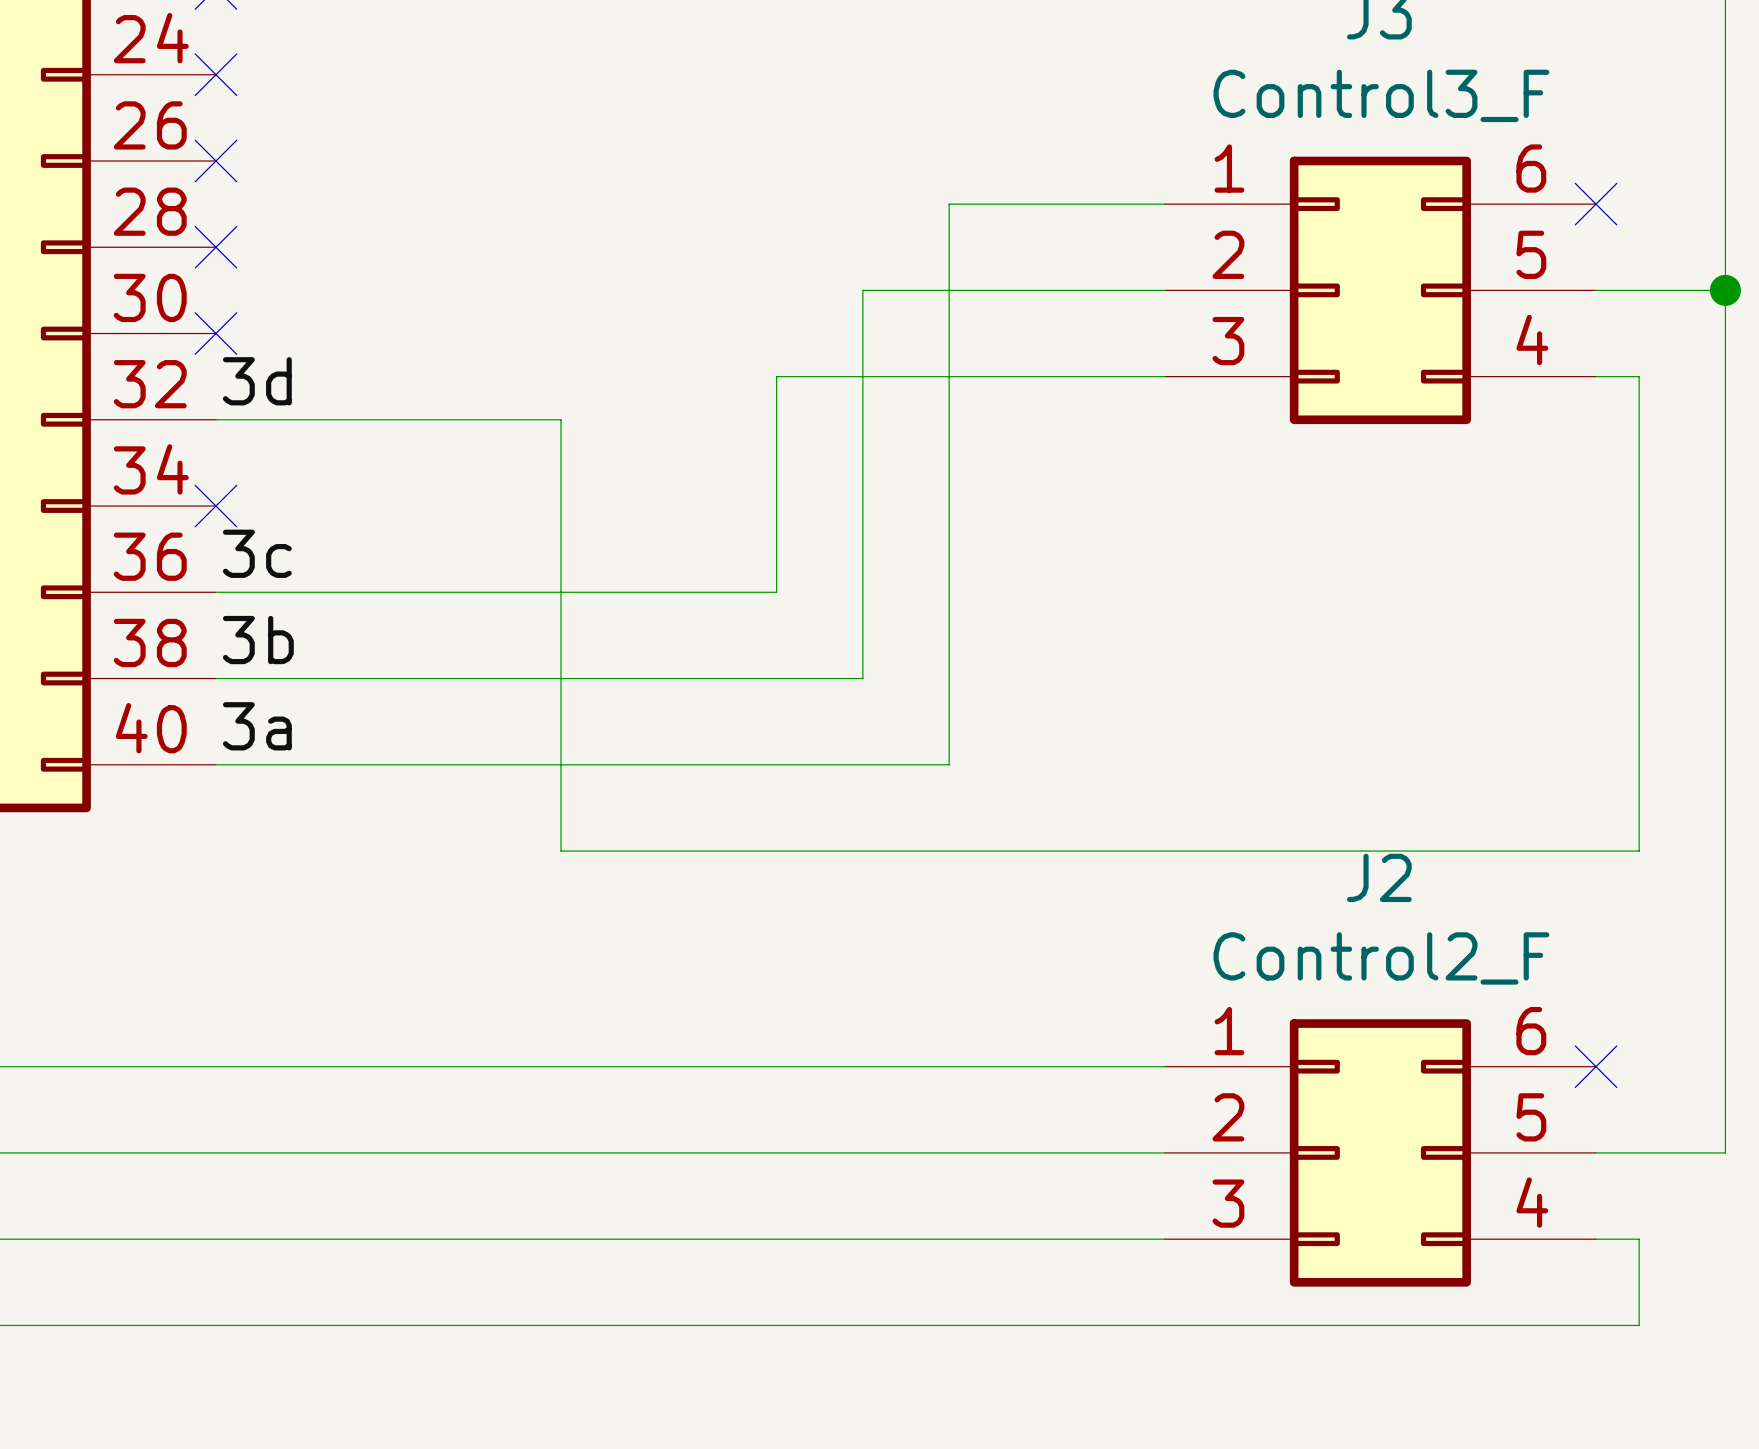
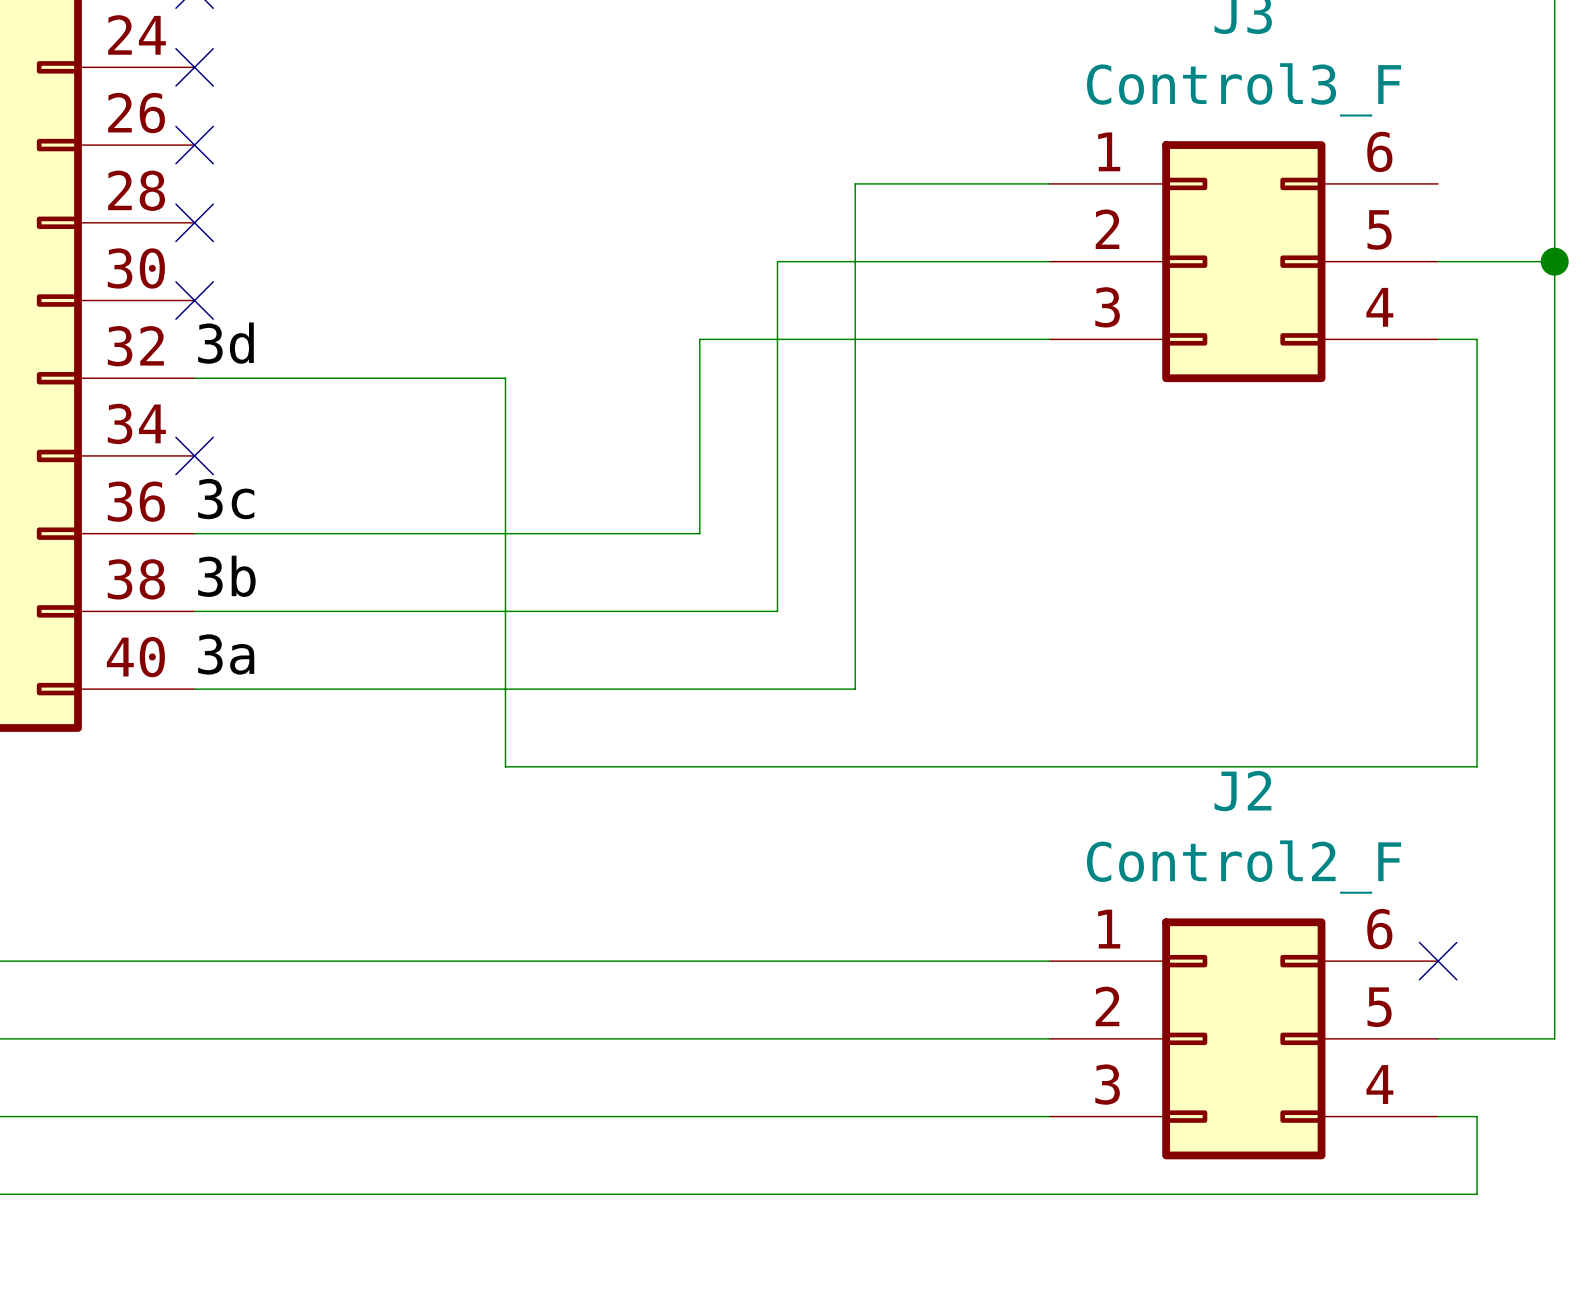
no-connect mark: (1596, 204) -> none

